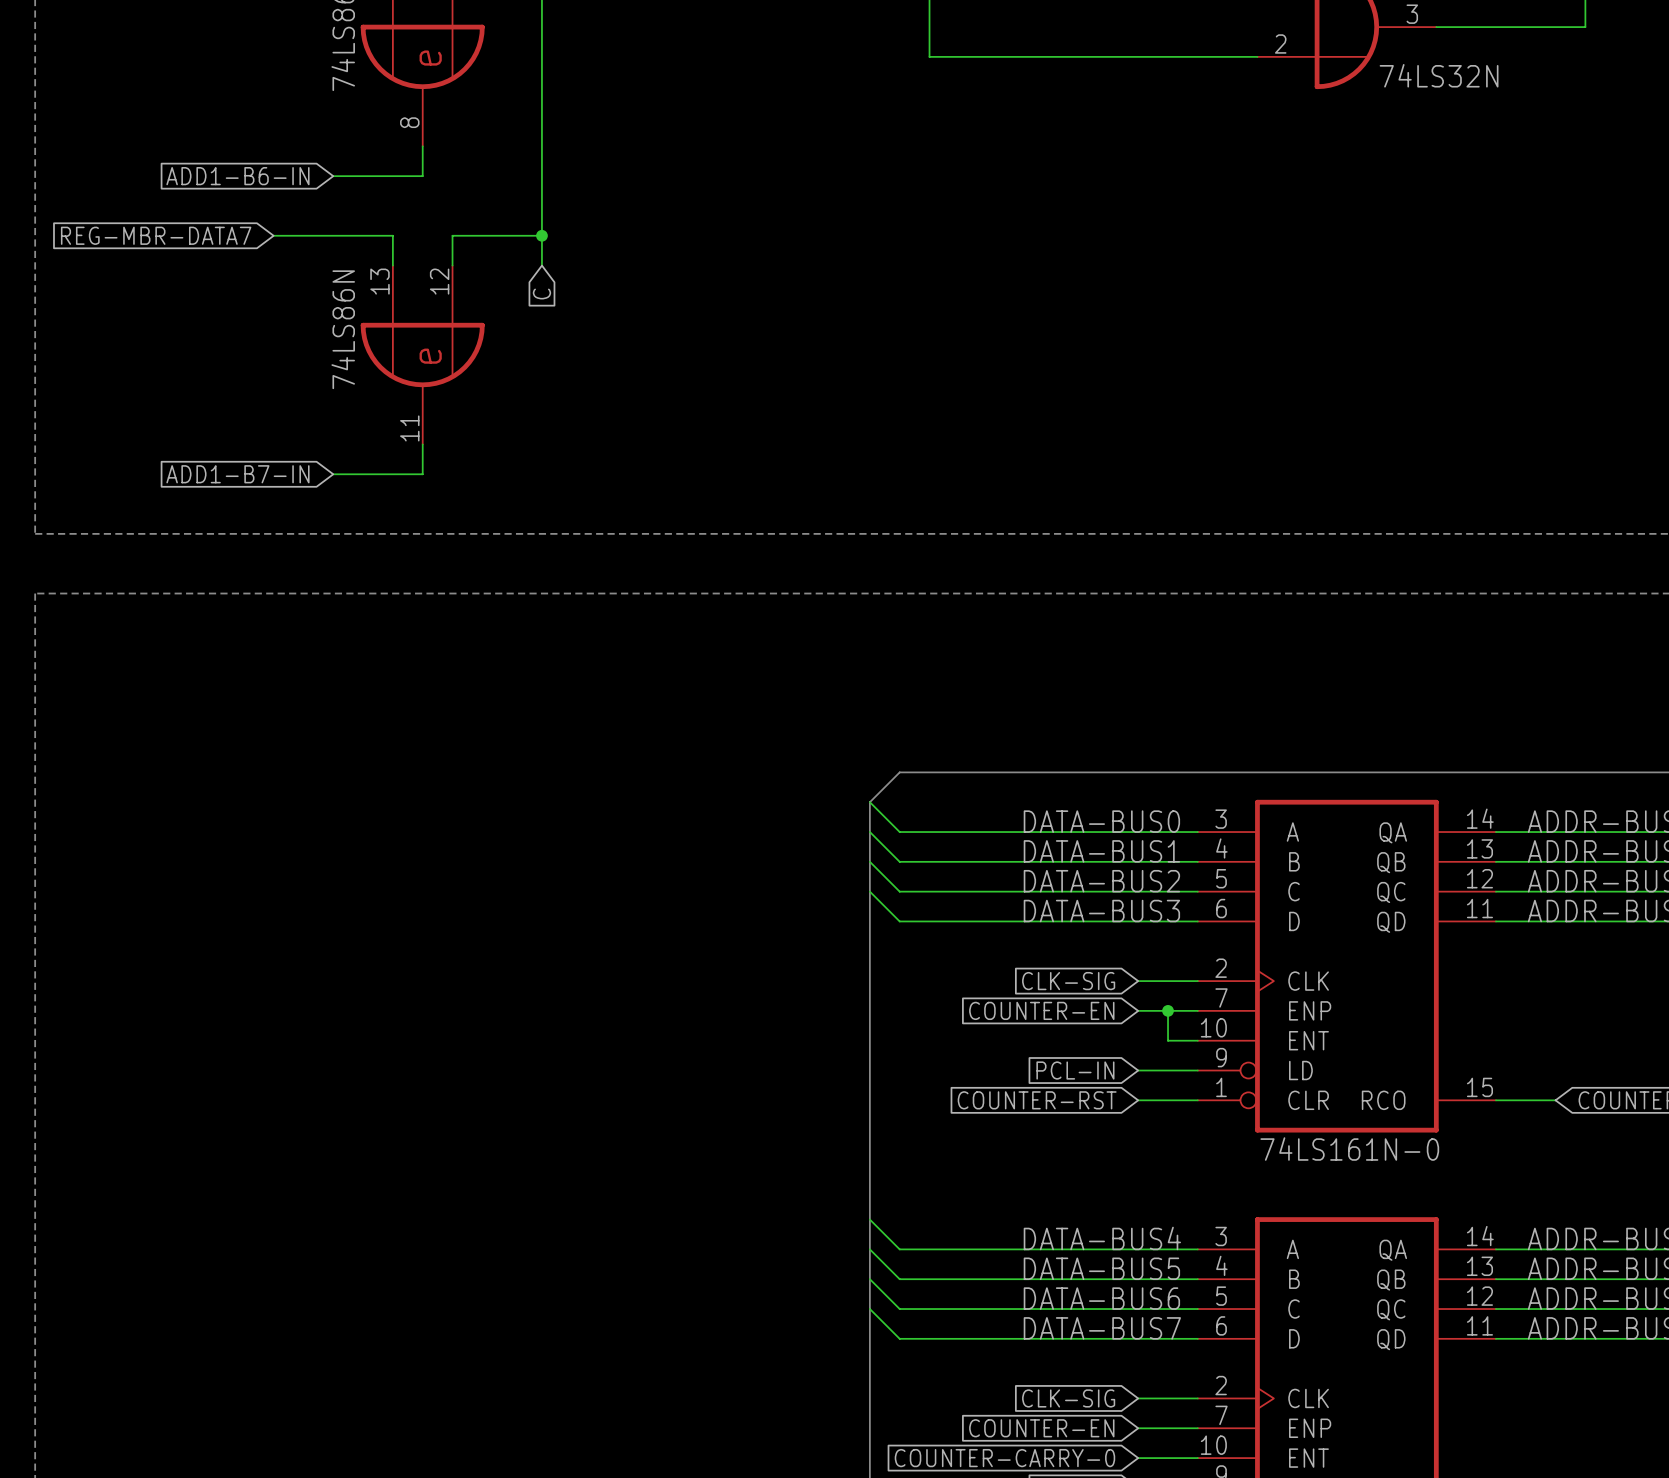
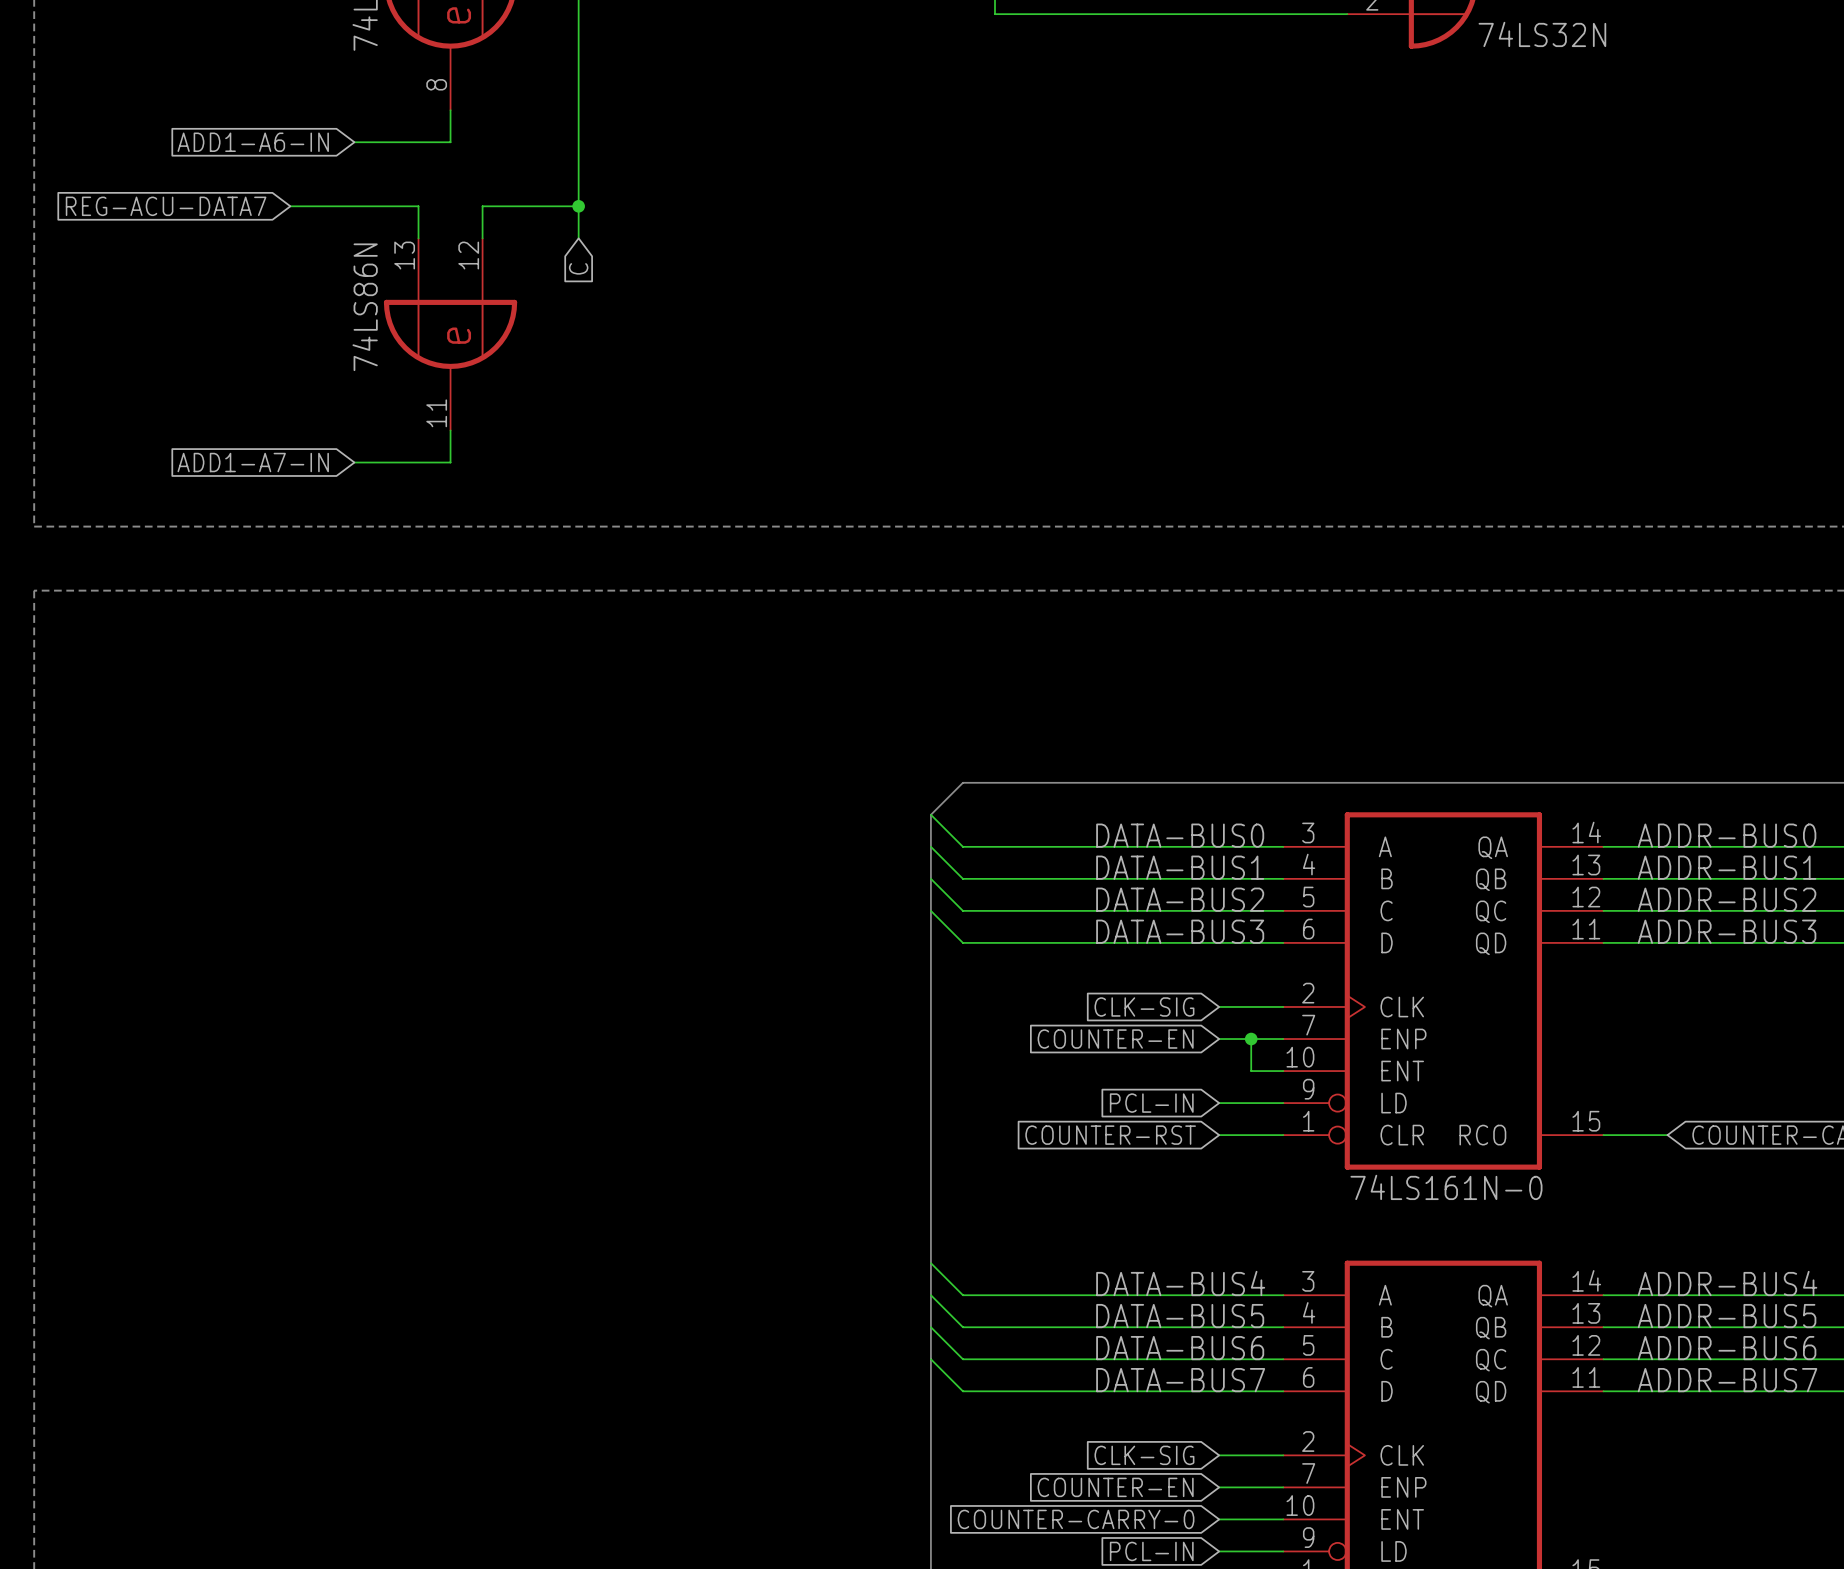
global label: ADD1-B6-IN (237, 176) -> ADD1-A6-IN (253, 142)
global label: REG-MBR-DATA7 (156, 235) -> REG-ACU-DATA7 (166, 206)
global label: ADD1-B7-IN (237, 474) -> ADD1-A7-IN (253, 462)

